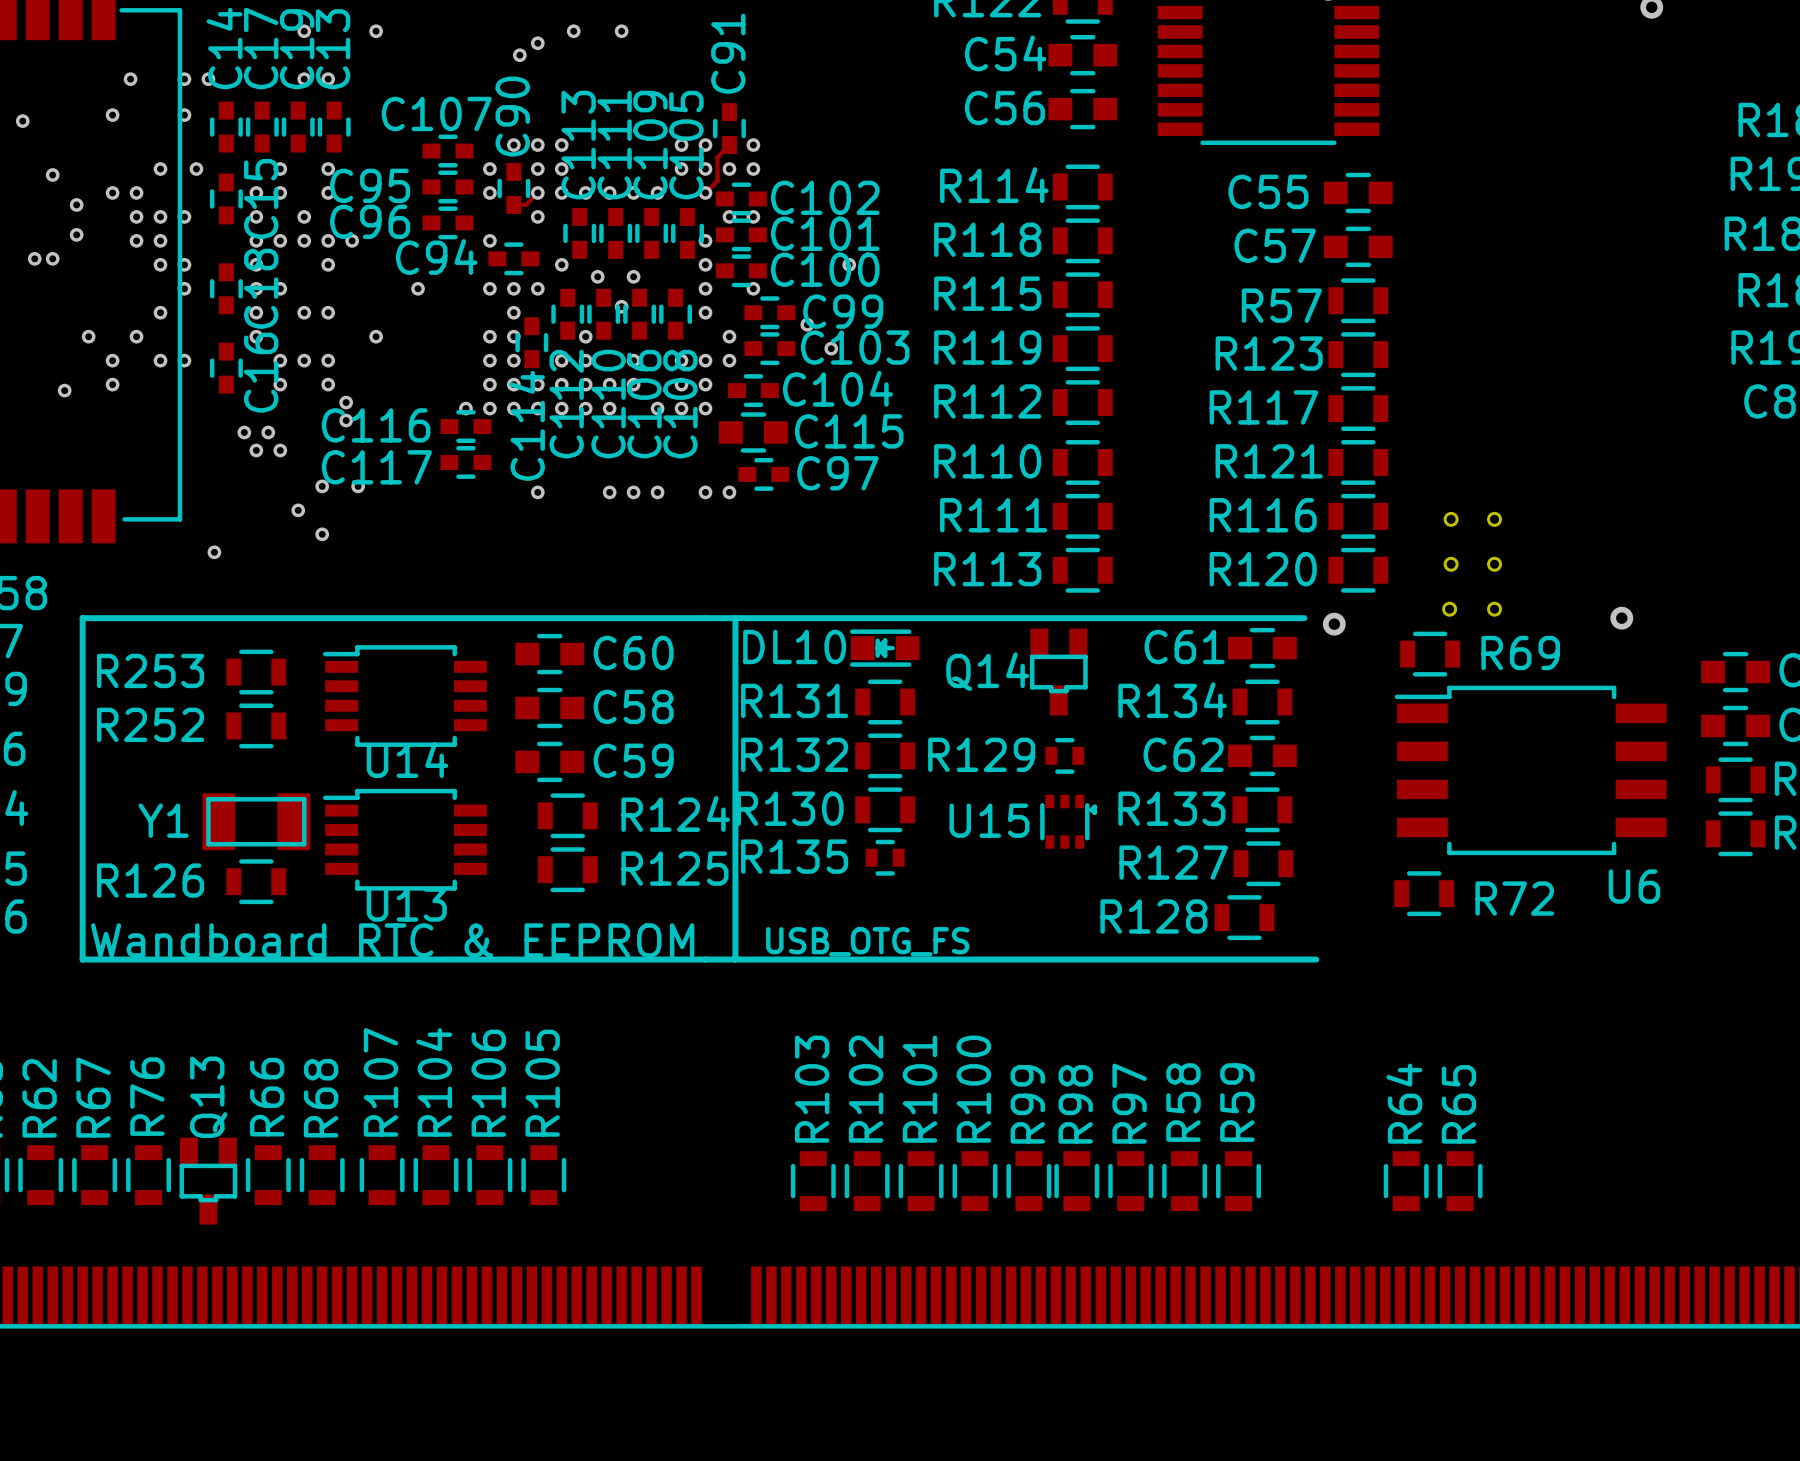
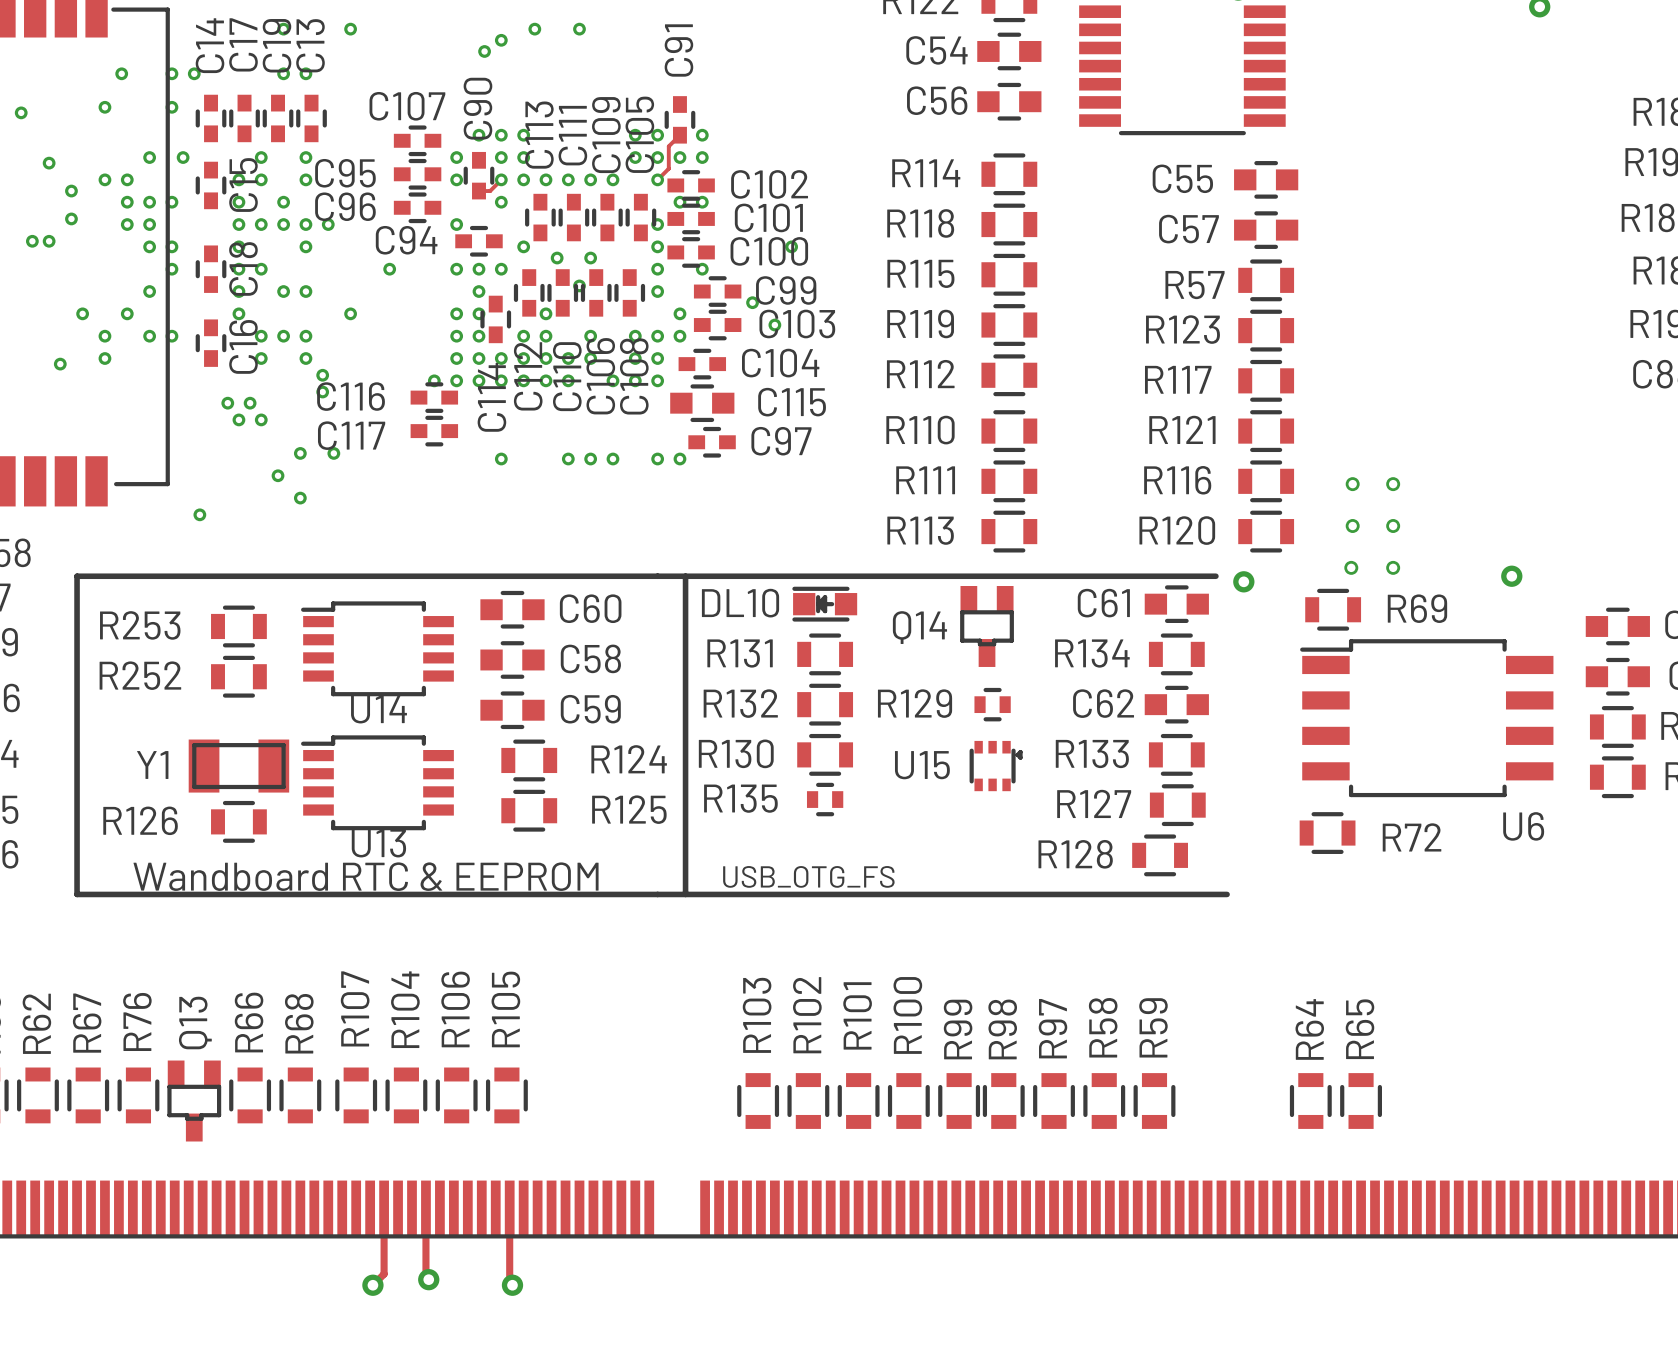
track: none -> (384, 1208) (384, 1274) (372, 1285)
track: none -> (425, 1208) (425, 1276) (428, 1279)
track: none -> (509, 1208) (509, 1282) (512, 1285)
via: none -> (428, 1279)
via: none -> (372, 1285)
via: none -> (512, 1285)

